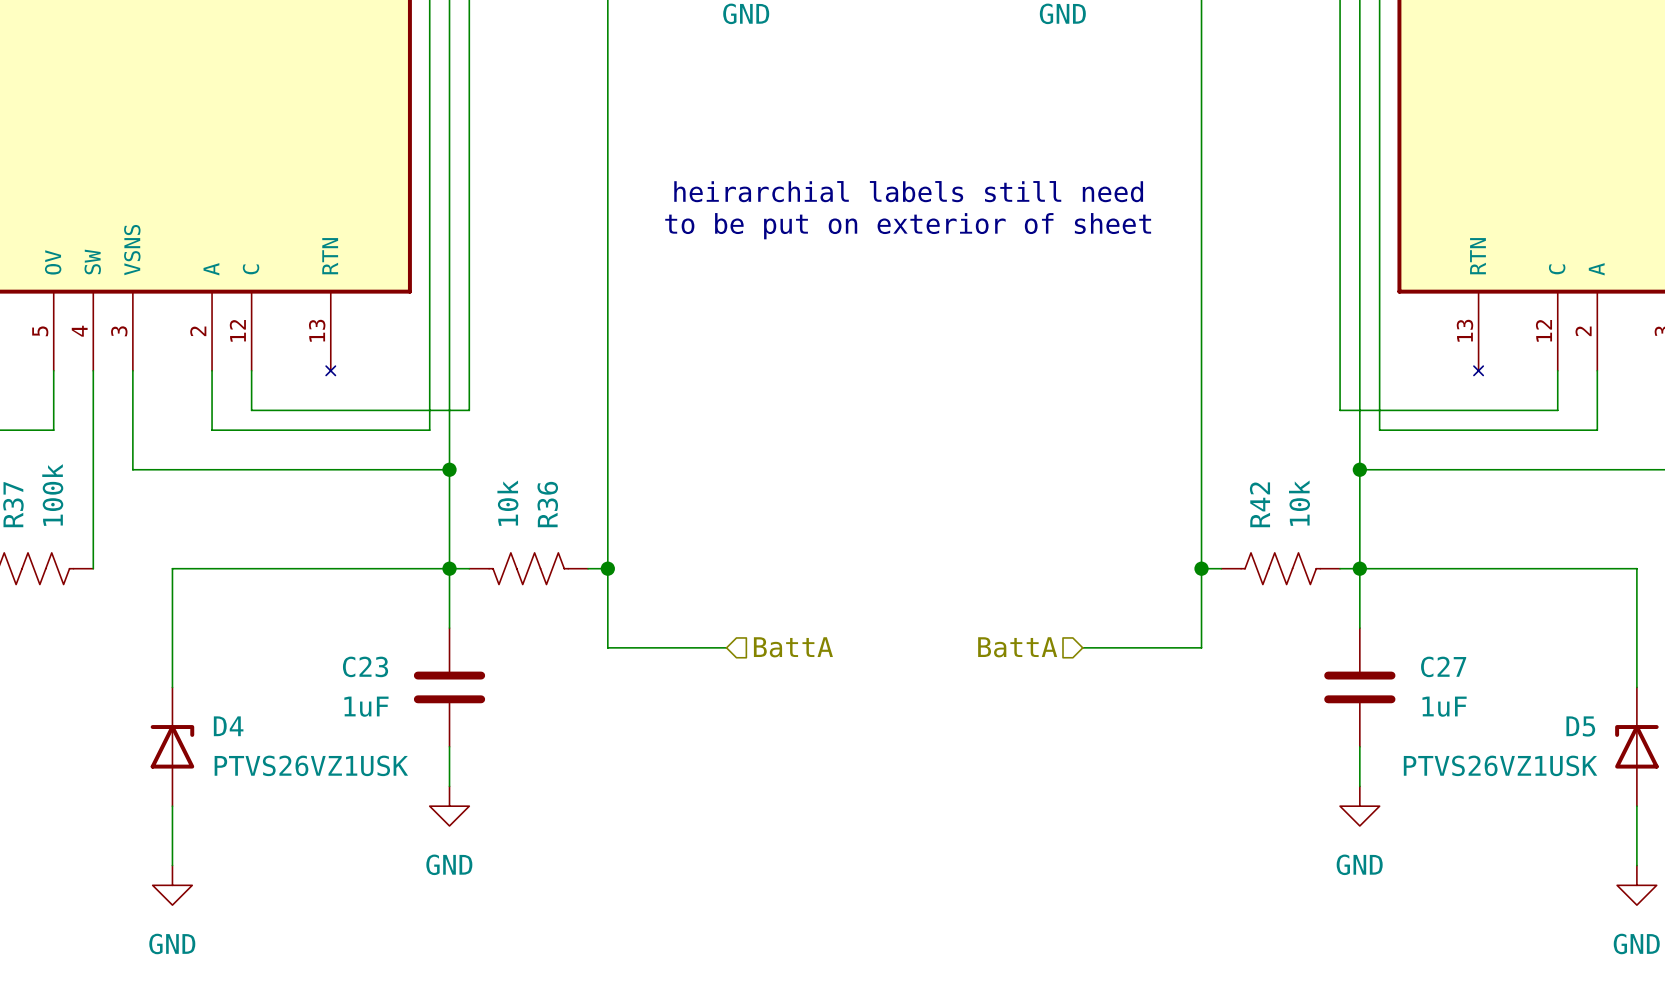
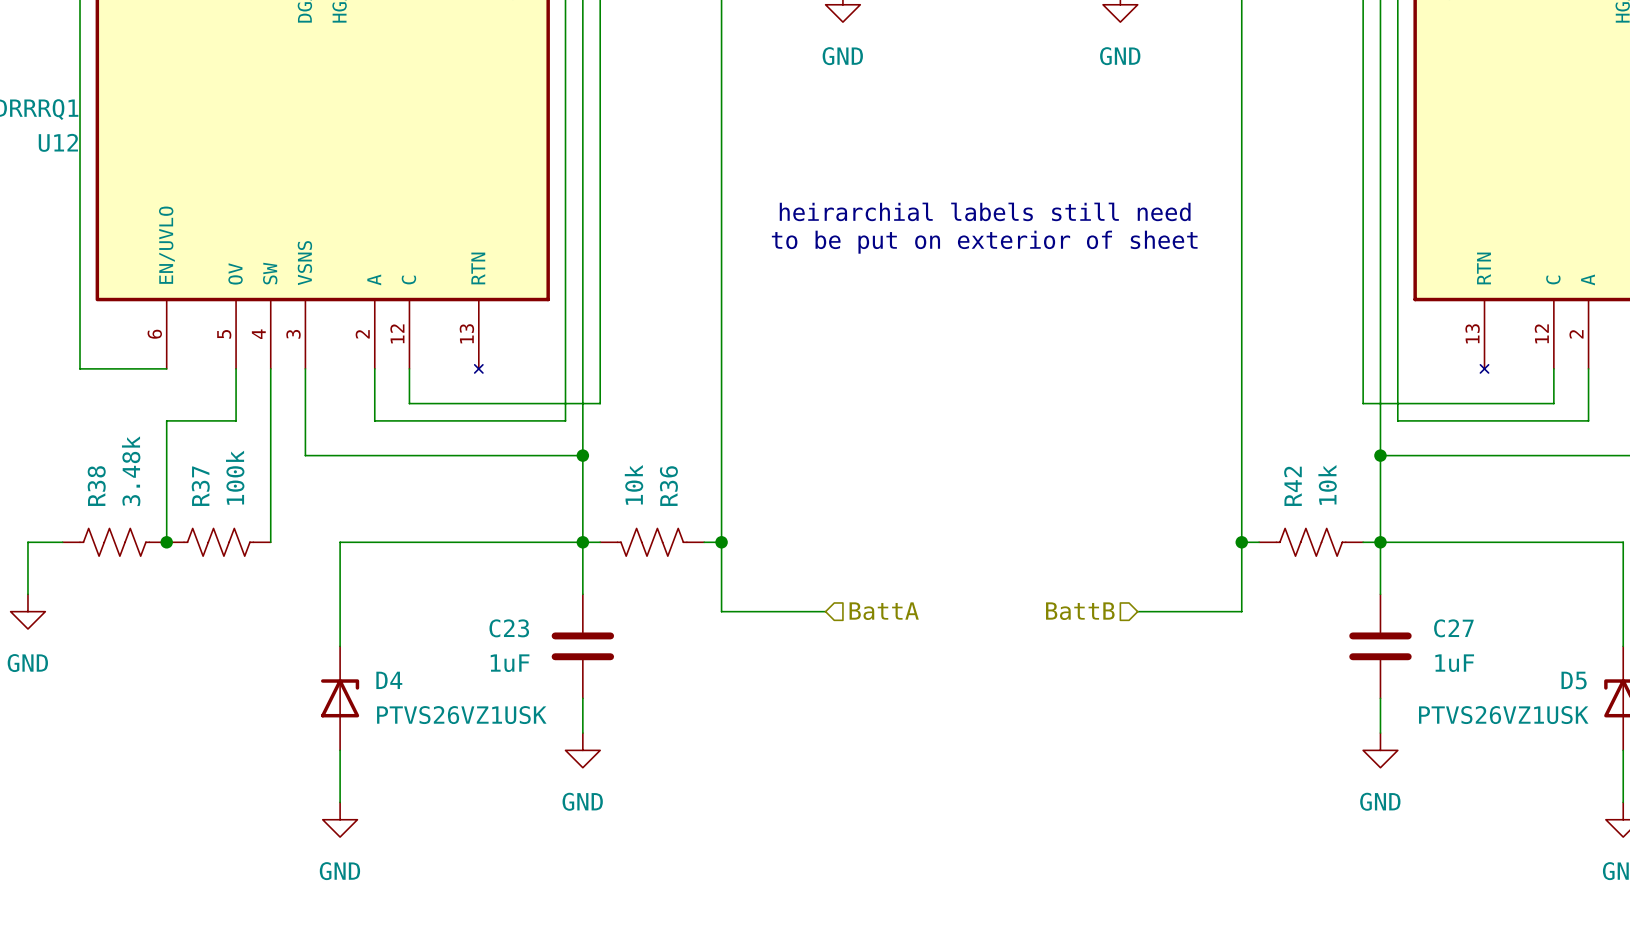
hierarchical label: BattA (1017, 647) -> BattB (1080, 611)

